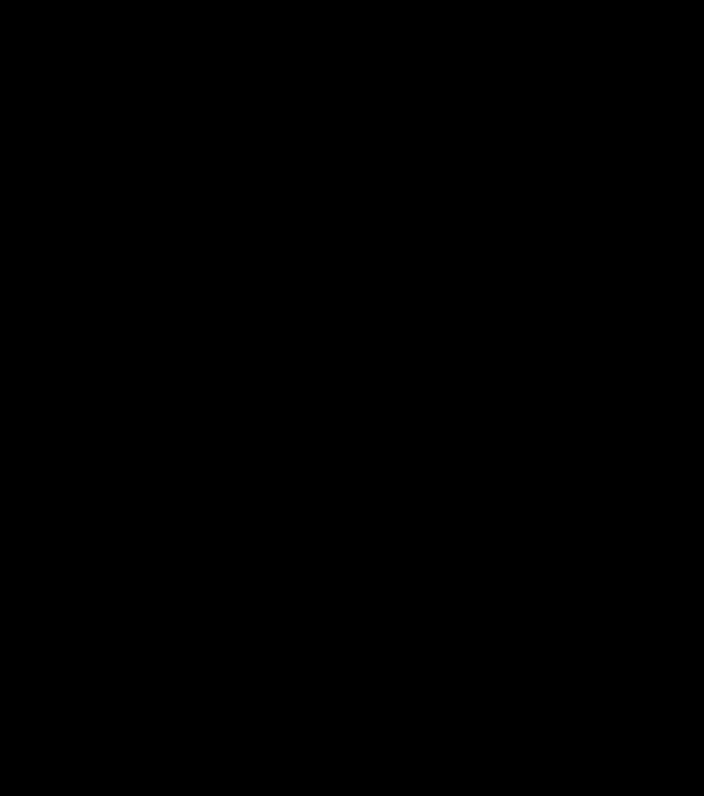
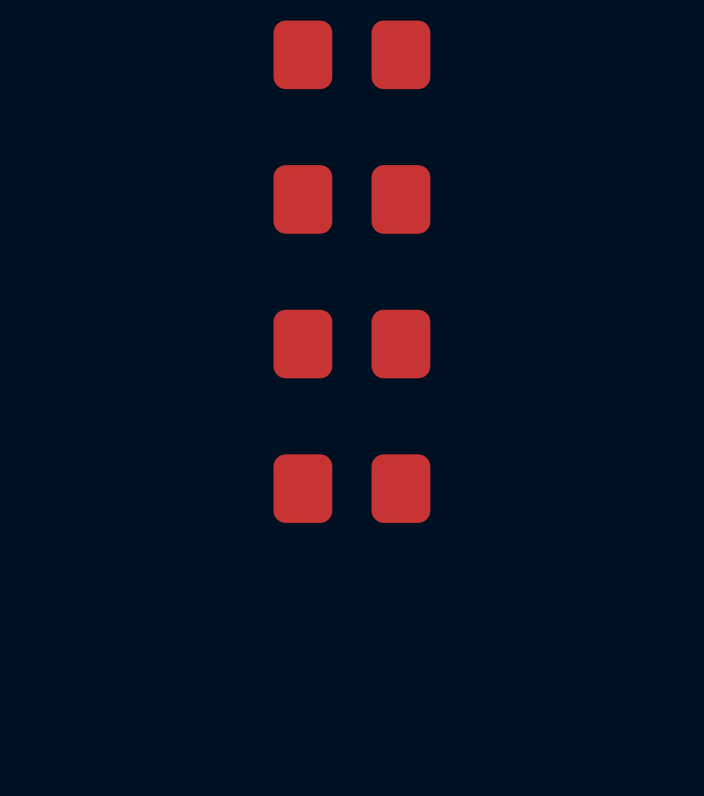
part: none -> (351, 54)
part: none -> (351, 199)
part: none -> (351, 344)
part: none -> (351, 488)

